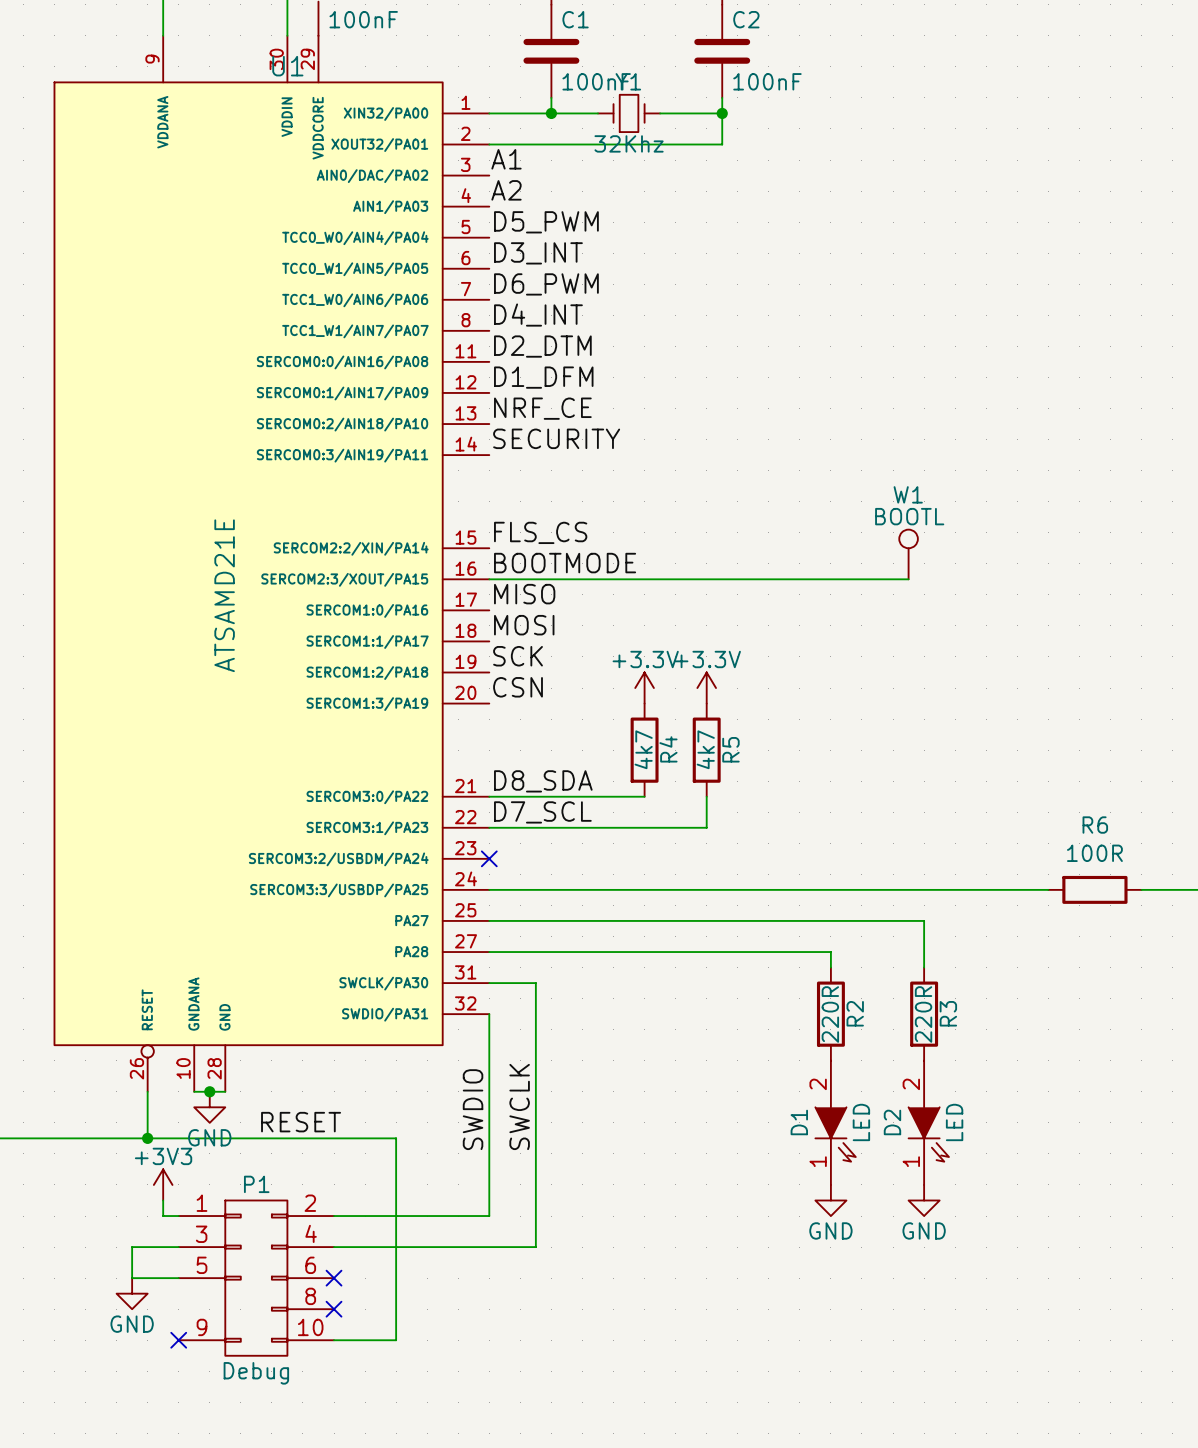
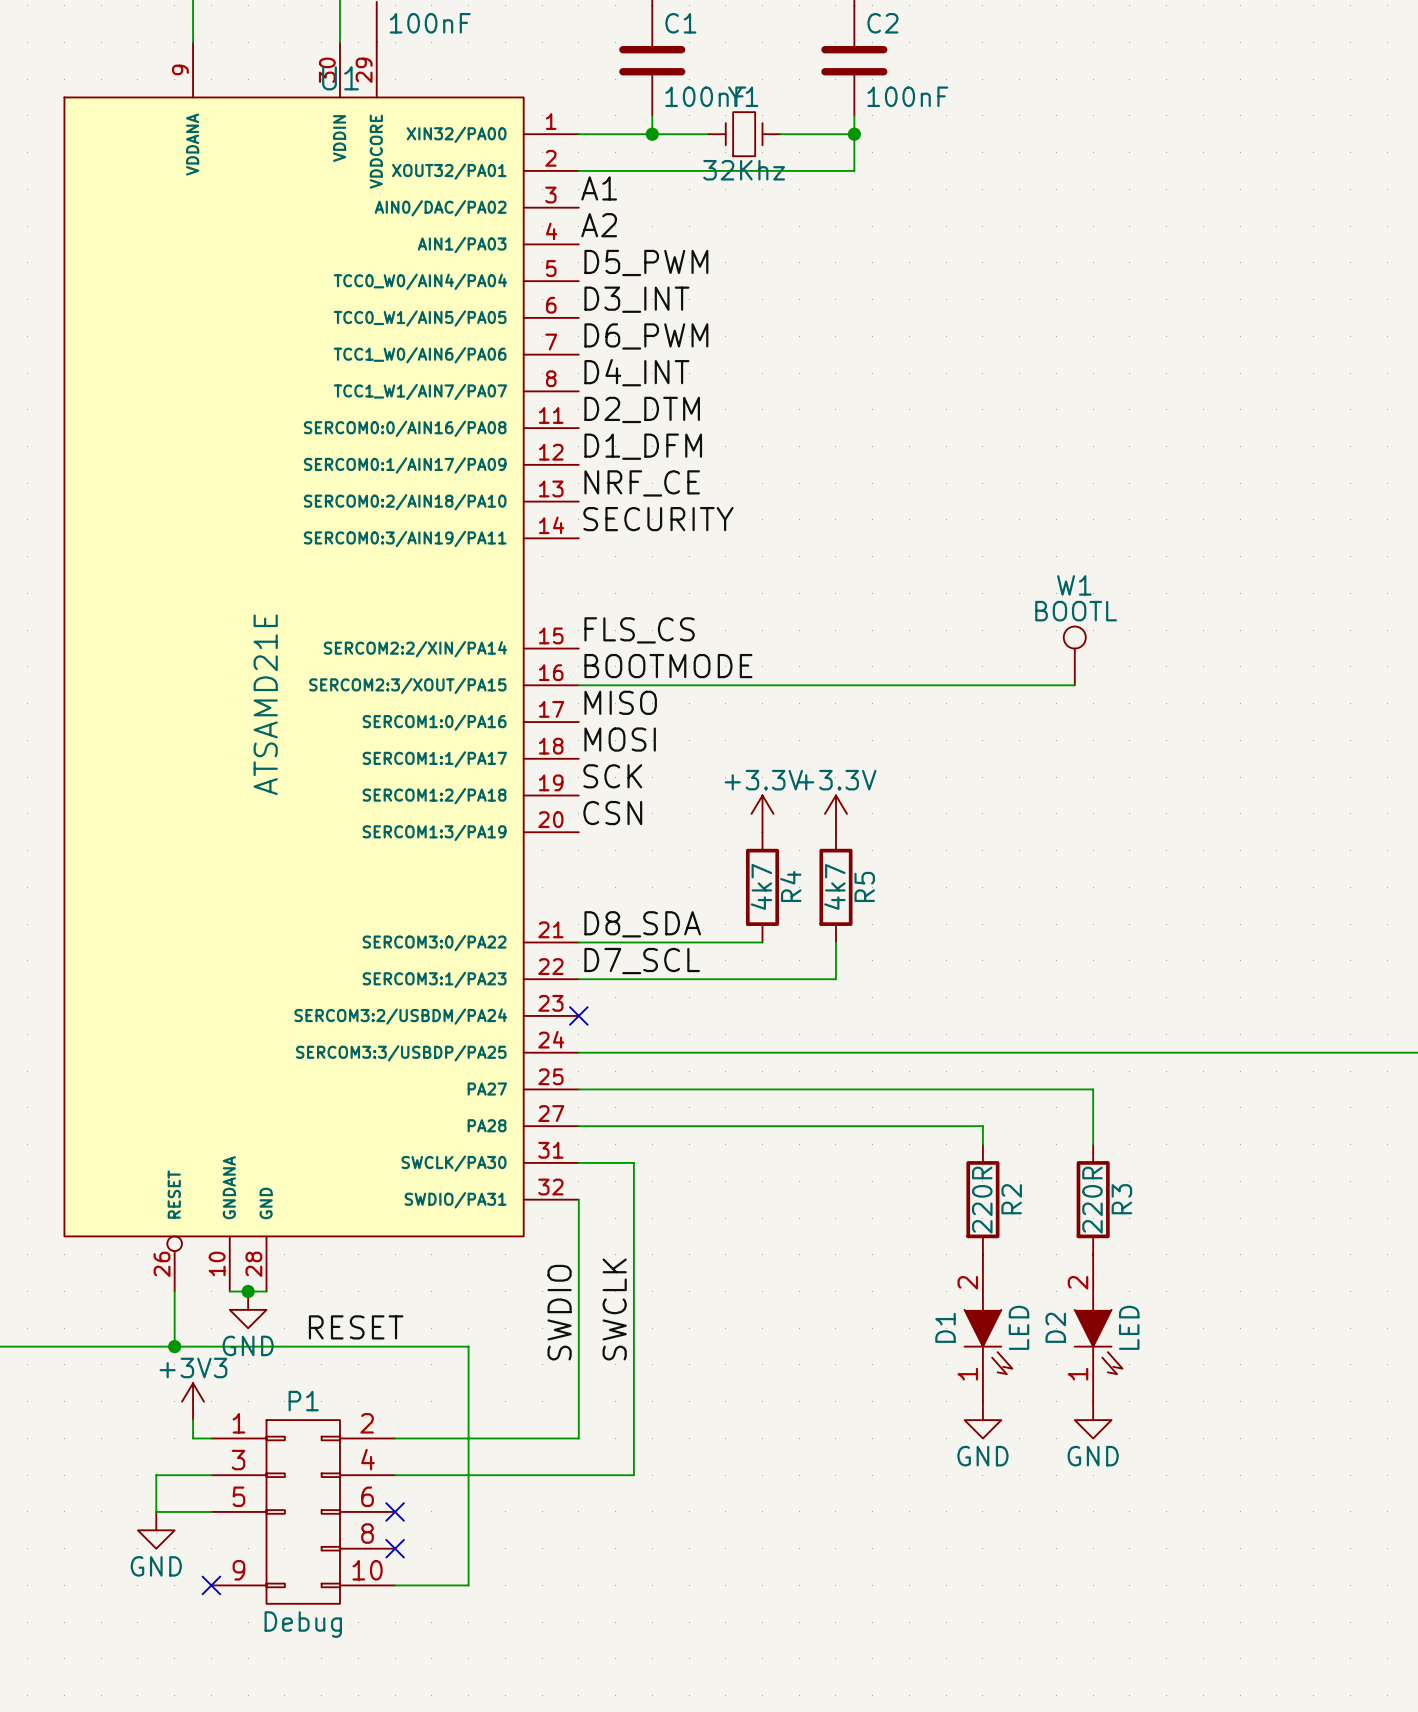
wire: none -> (1240, 1052) (1350, 1052)
R6: 100R (1094, 889) -> none

